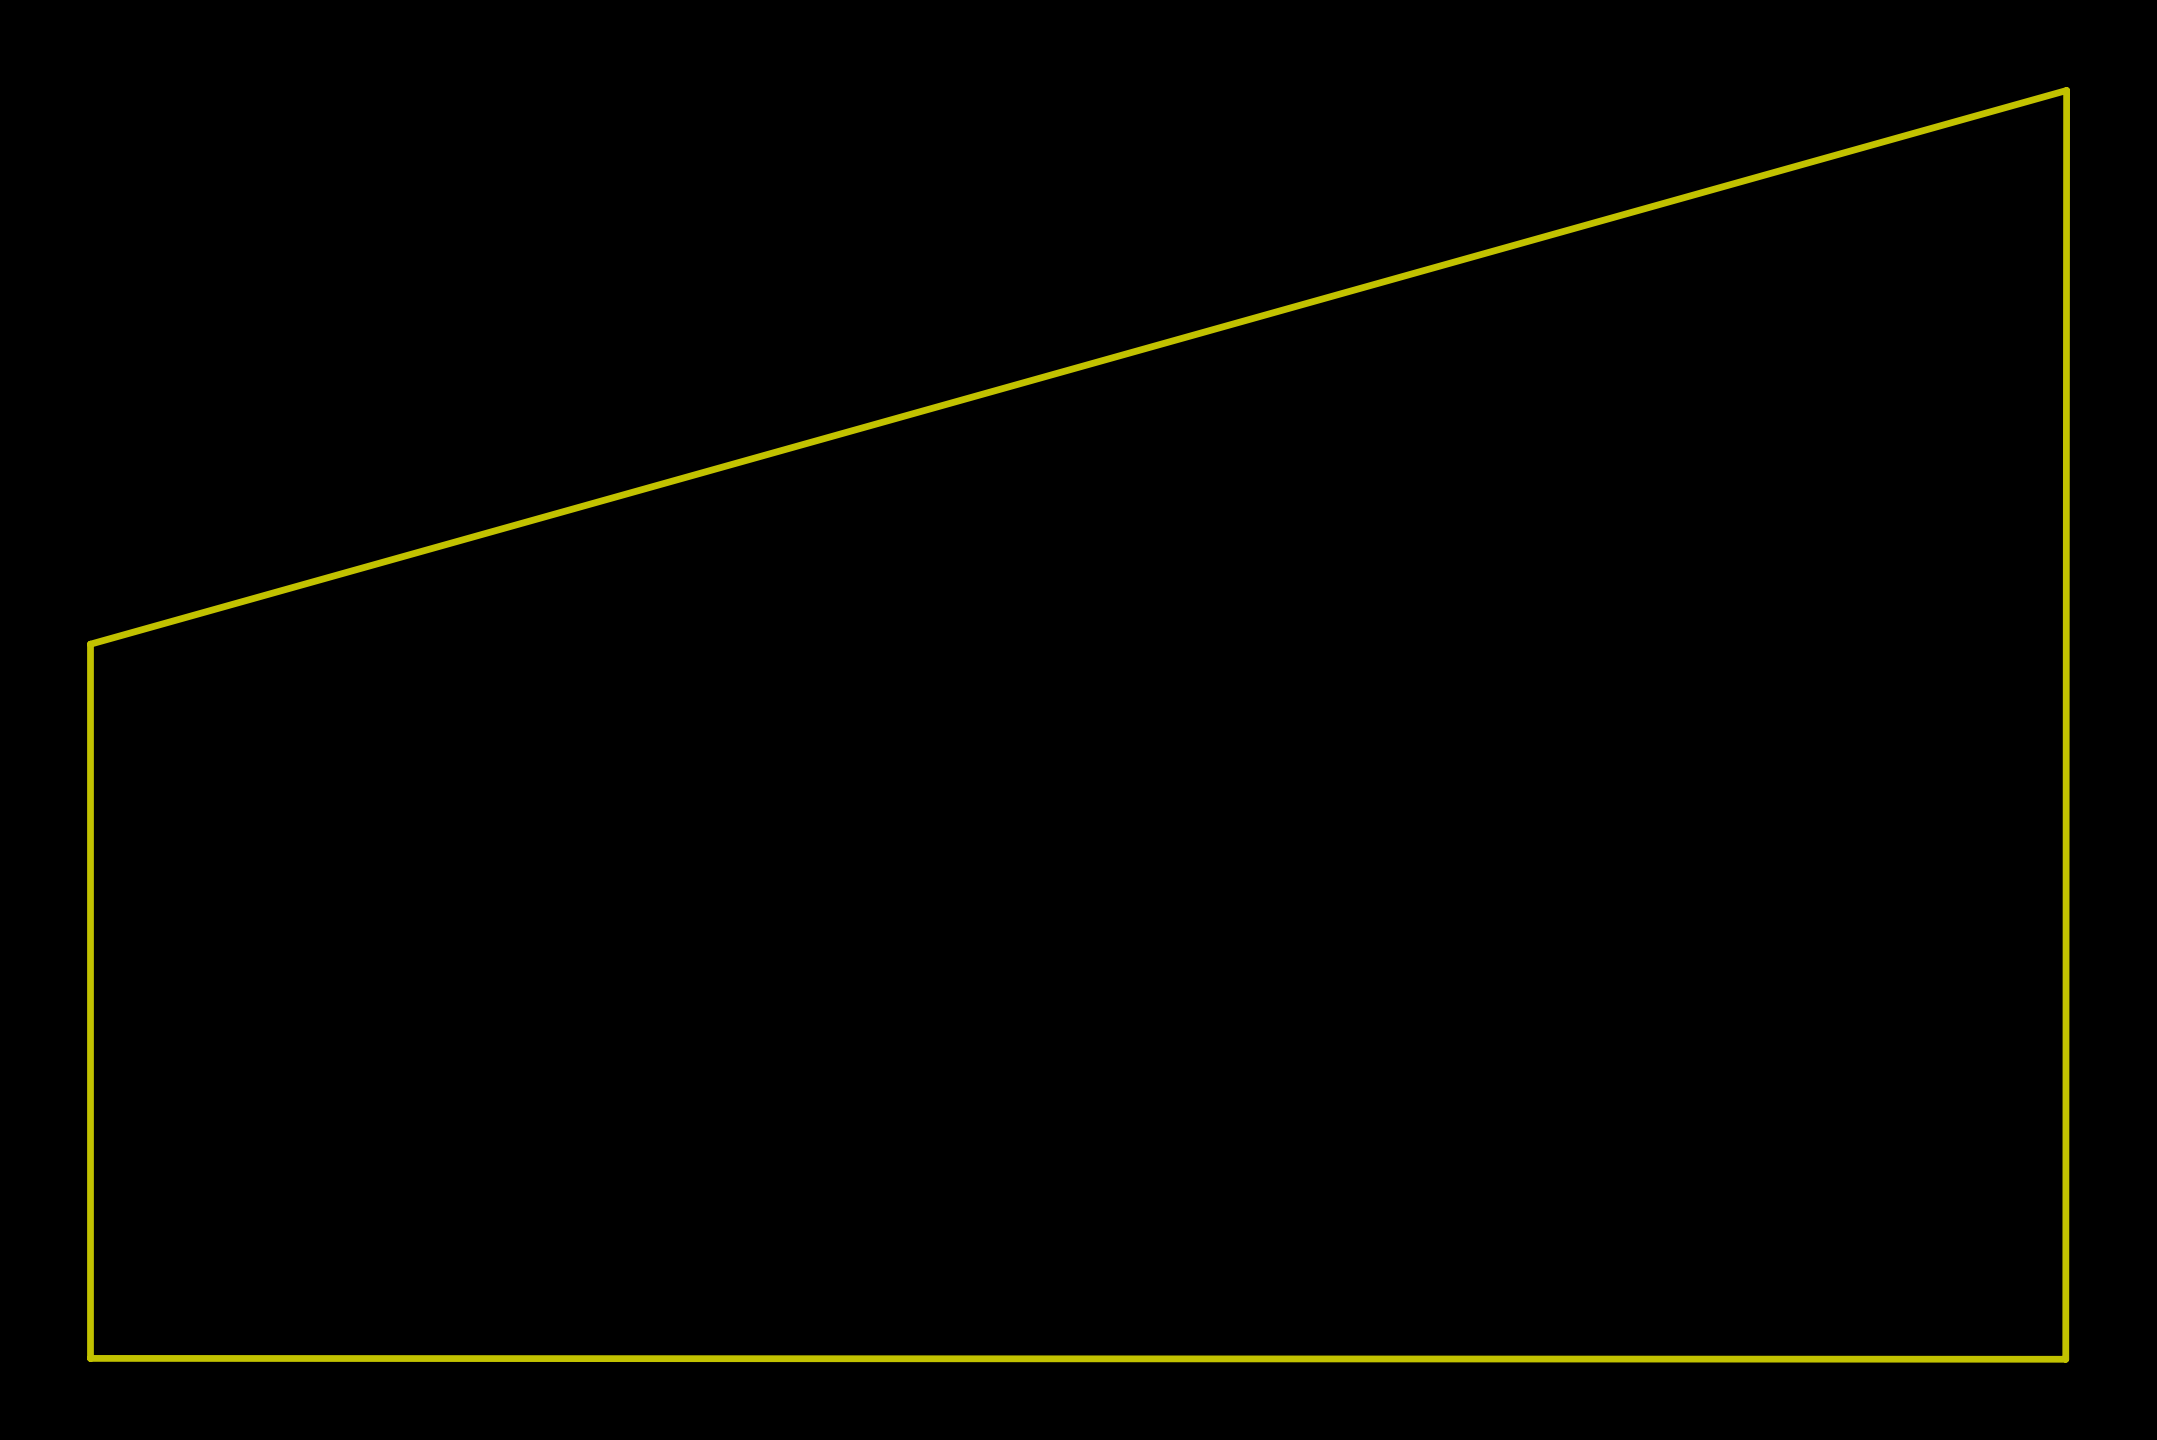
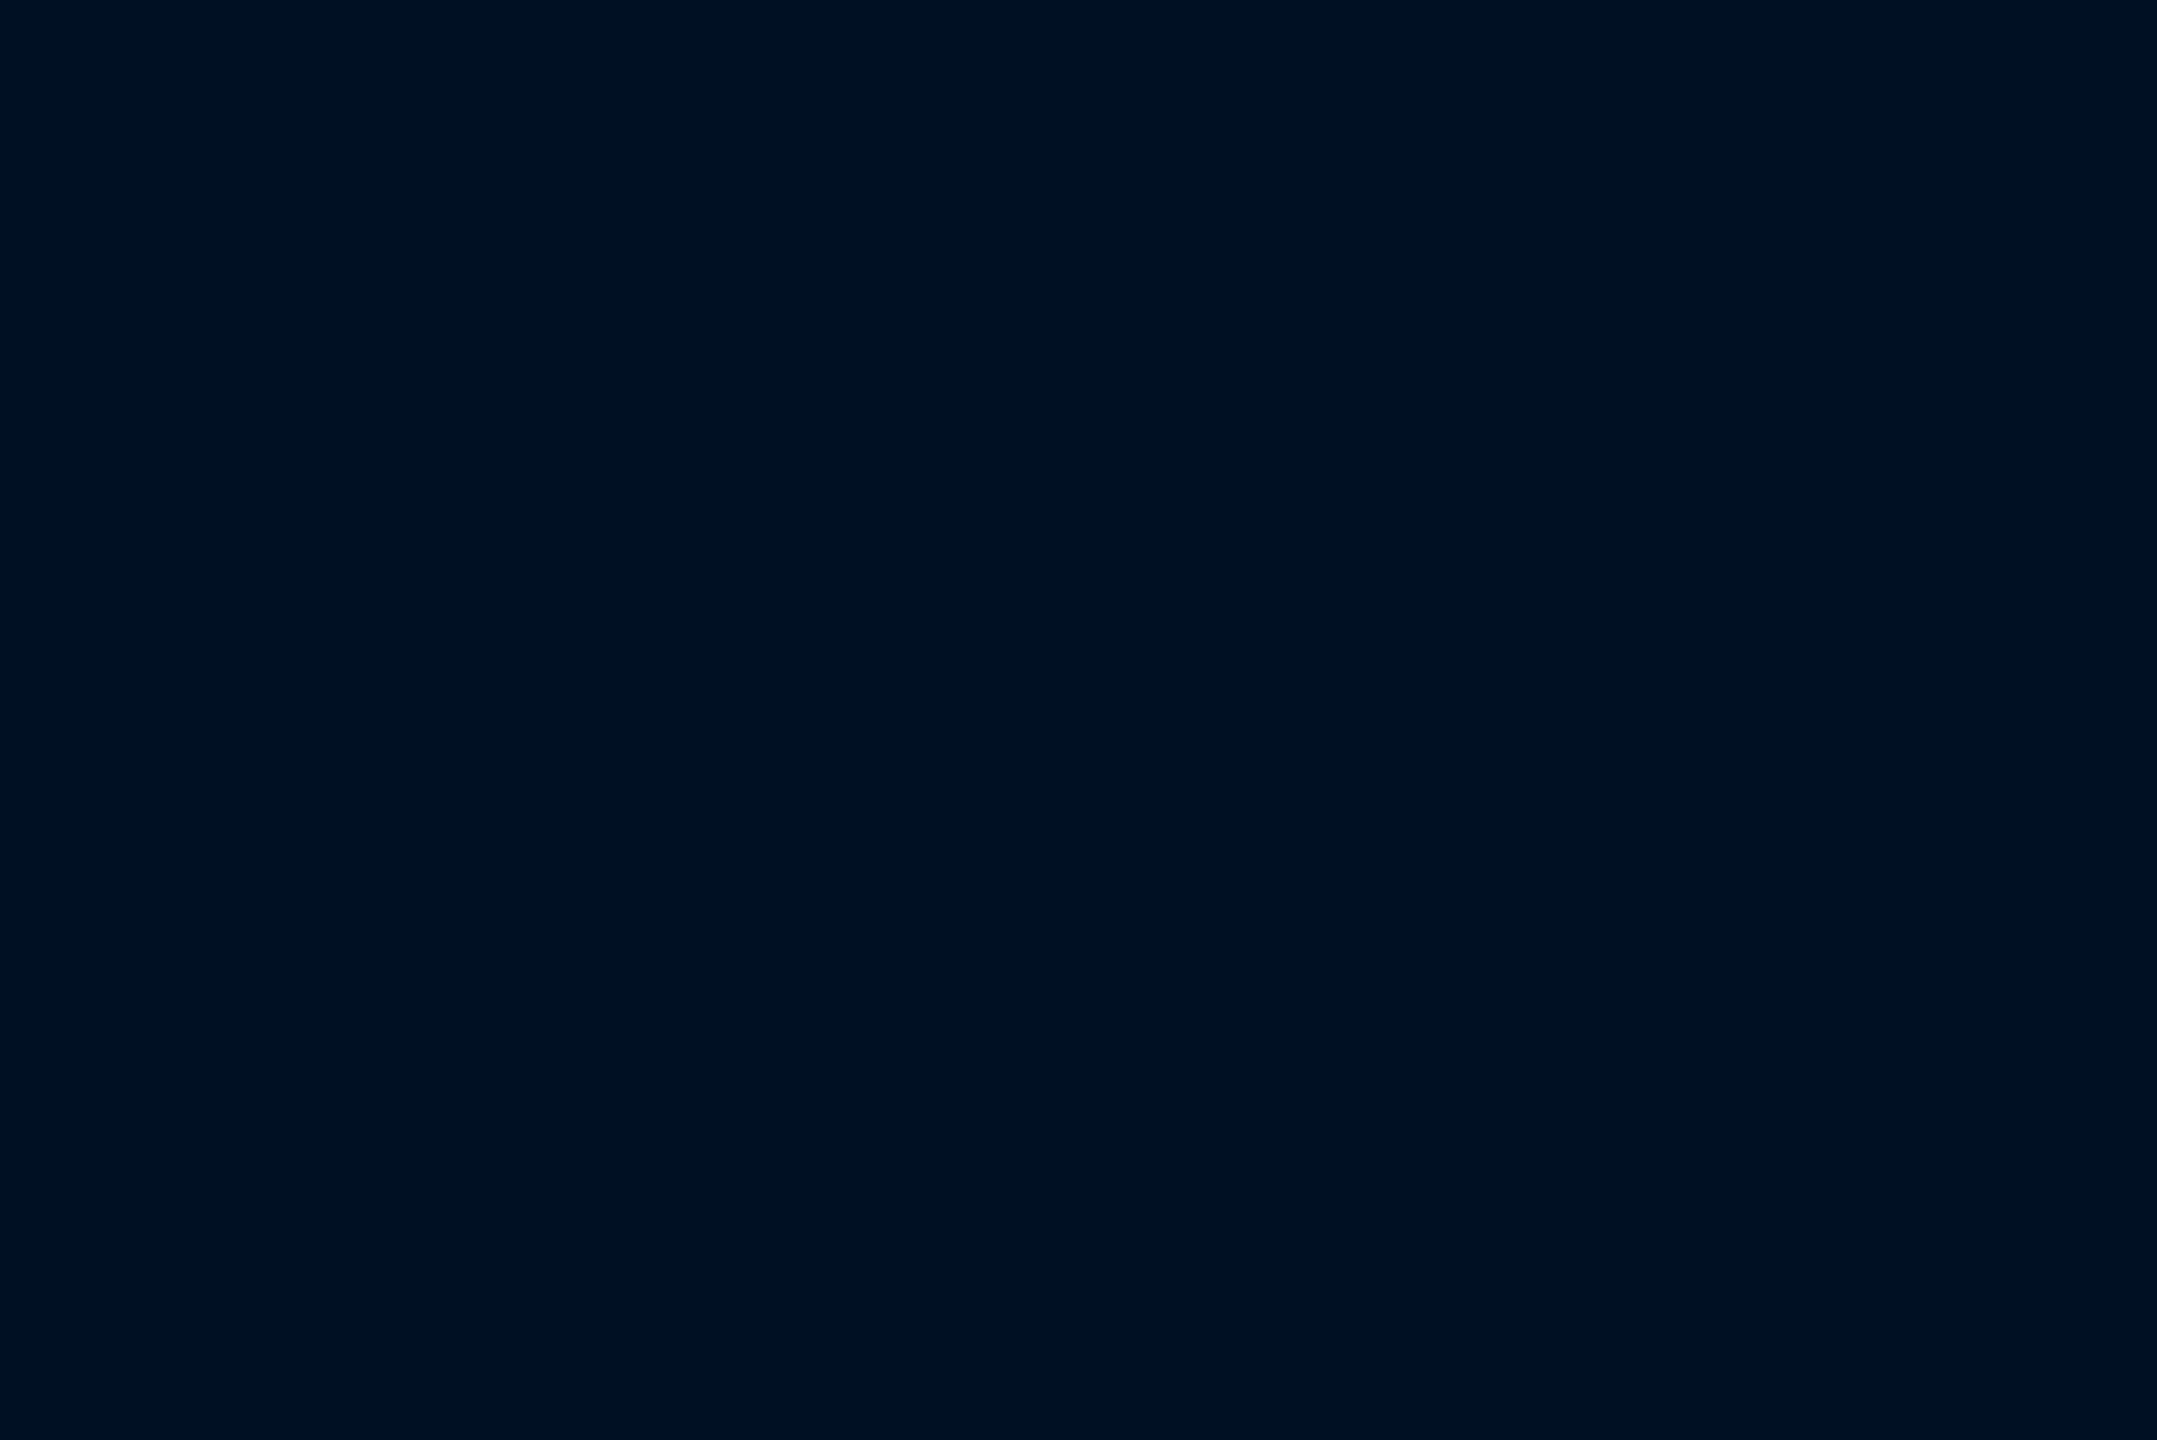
board edge: (2066, 90) (2065, 1359) (90, 1358) (90, 644) (2066, 90) -> none

